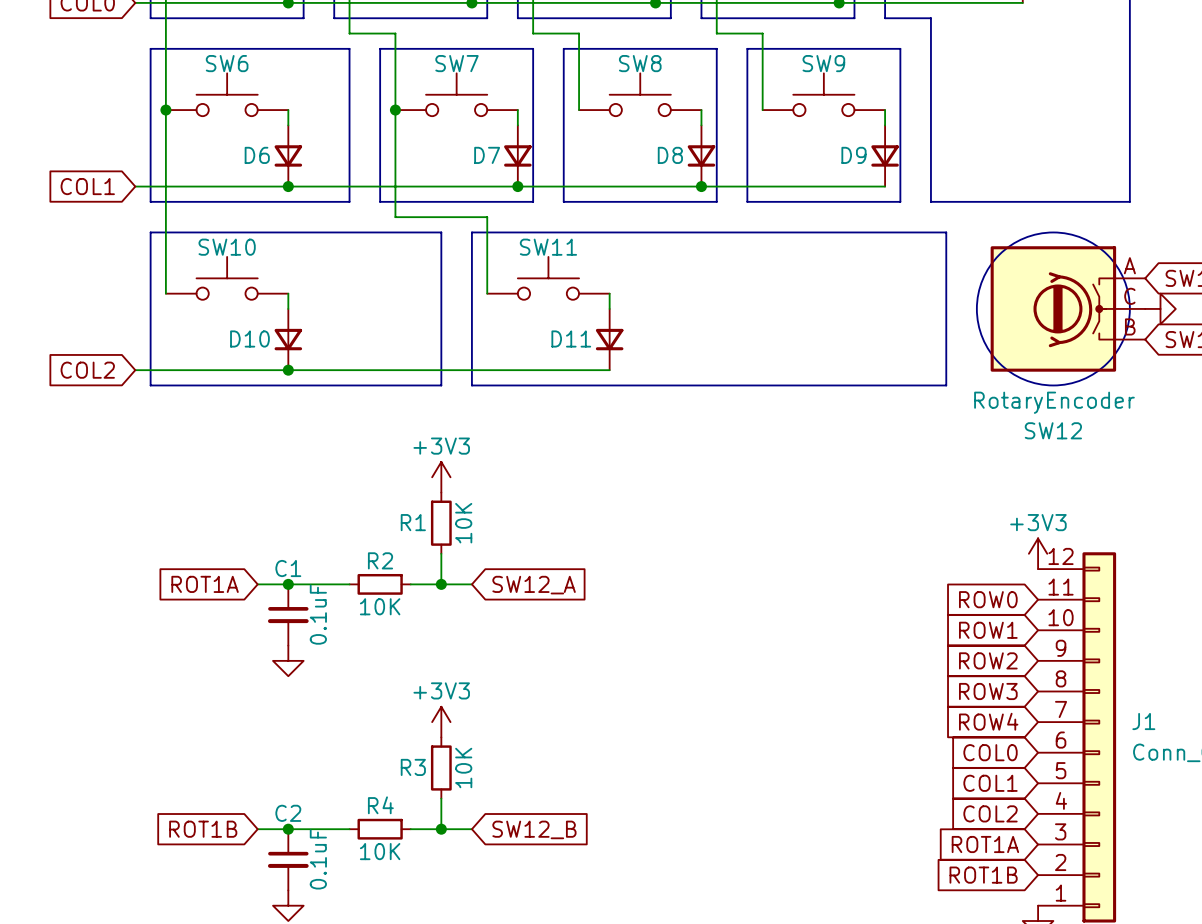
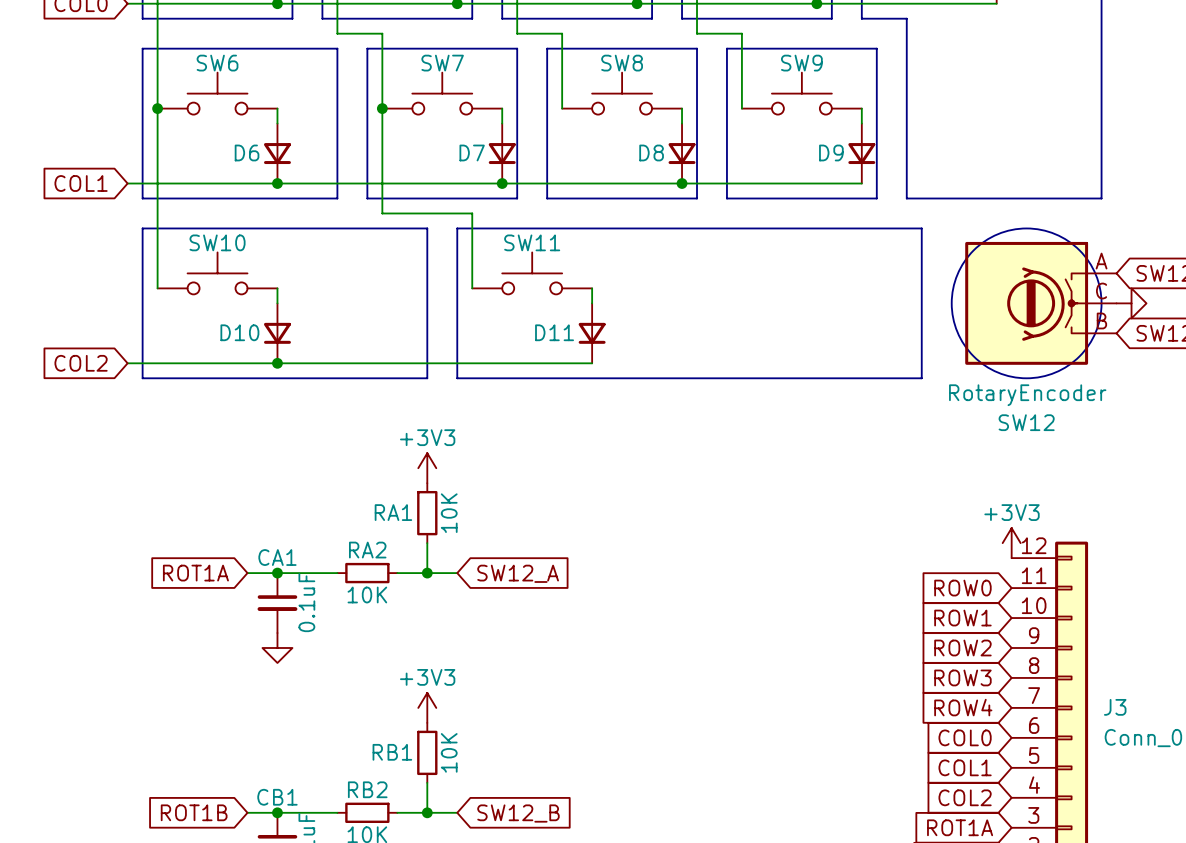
R1 name: R1 (413, 522) -> RA1 (393, 512)
R2 name: R2 (380, 560) -> RA2 (367, 550)
C1 name: C1 (288, 568) -> CA1 (277, 557)
J1 name: J1 (1143, 721) -> J3 (1115, 707)
R3 name: R3 (413, 767) -> RB1 (392, 752)
R4 name: R4 (380, 805) -> RB2 (367, 789)
C2 name: C2 (288, 813) -> CB1 (277, 797)

